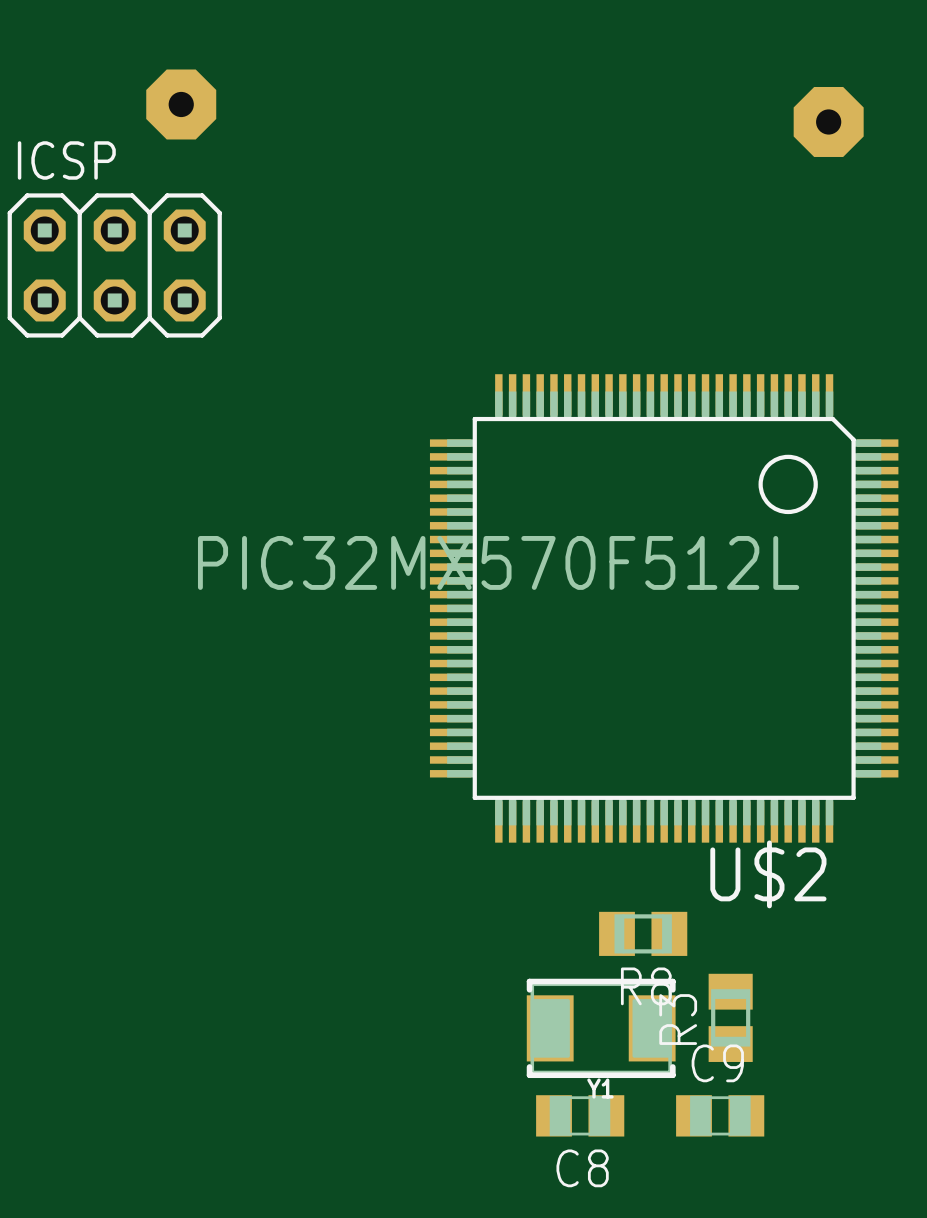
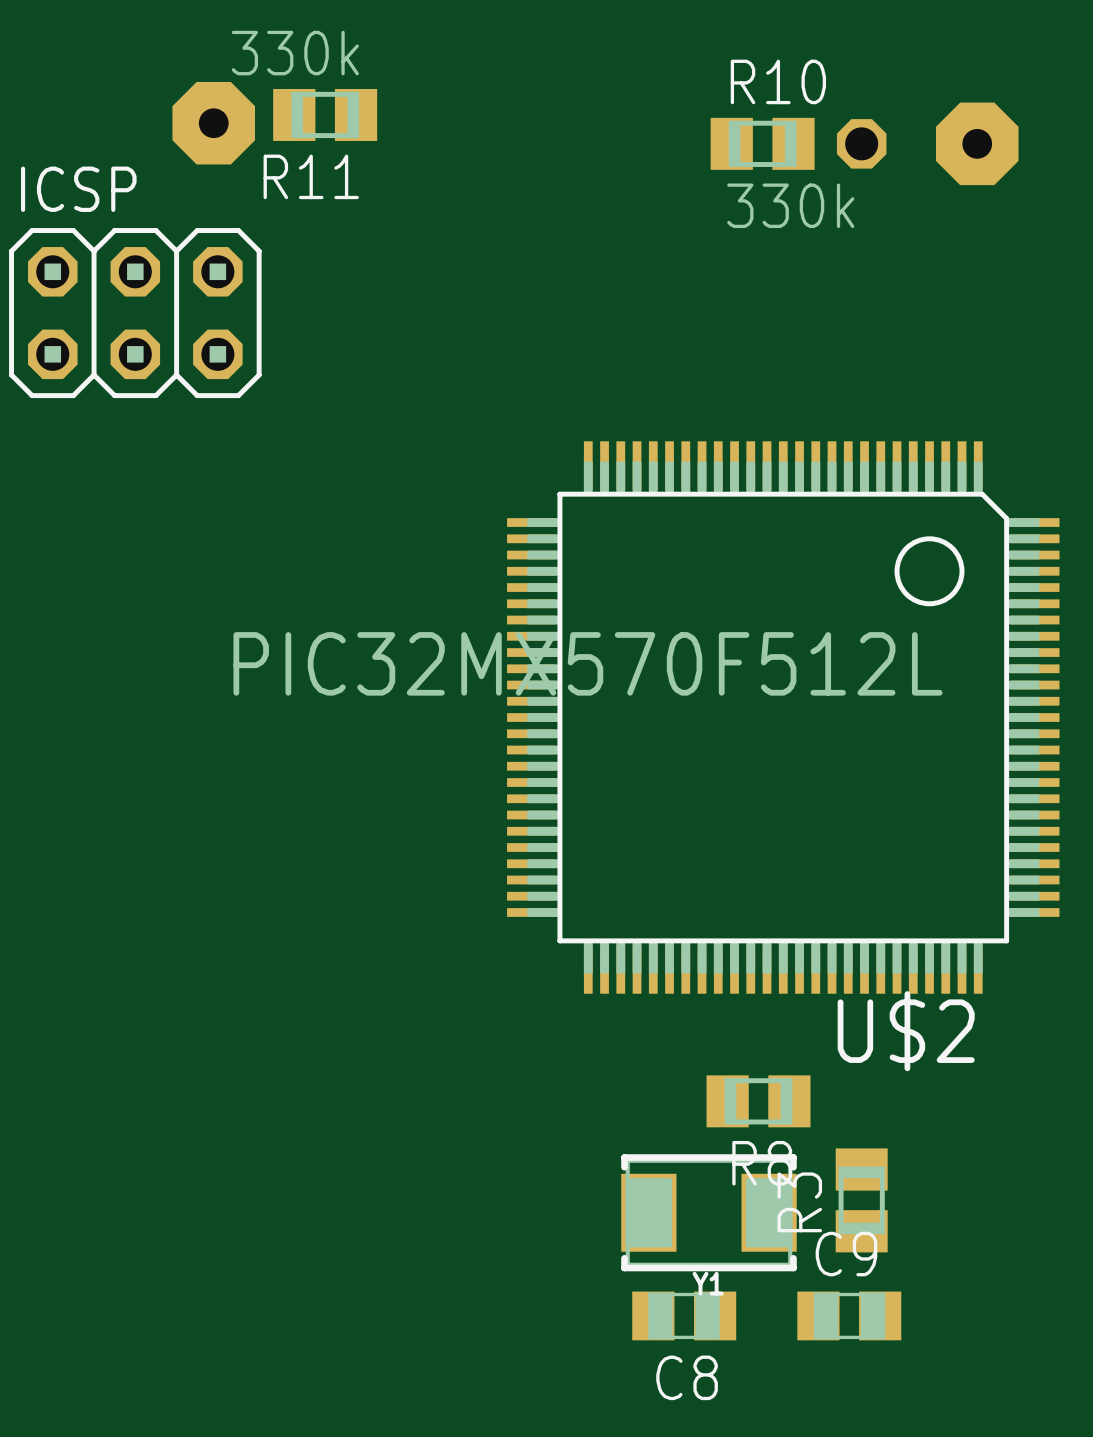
R11: none -> 330k (325, 114)
R10: none -> 330k (762, 143)
part: none -> (861, 143)

